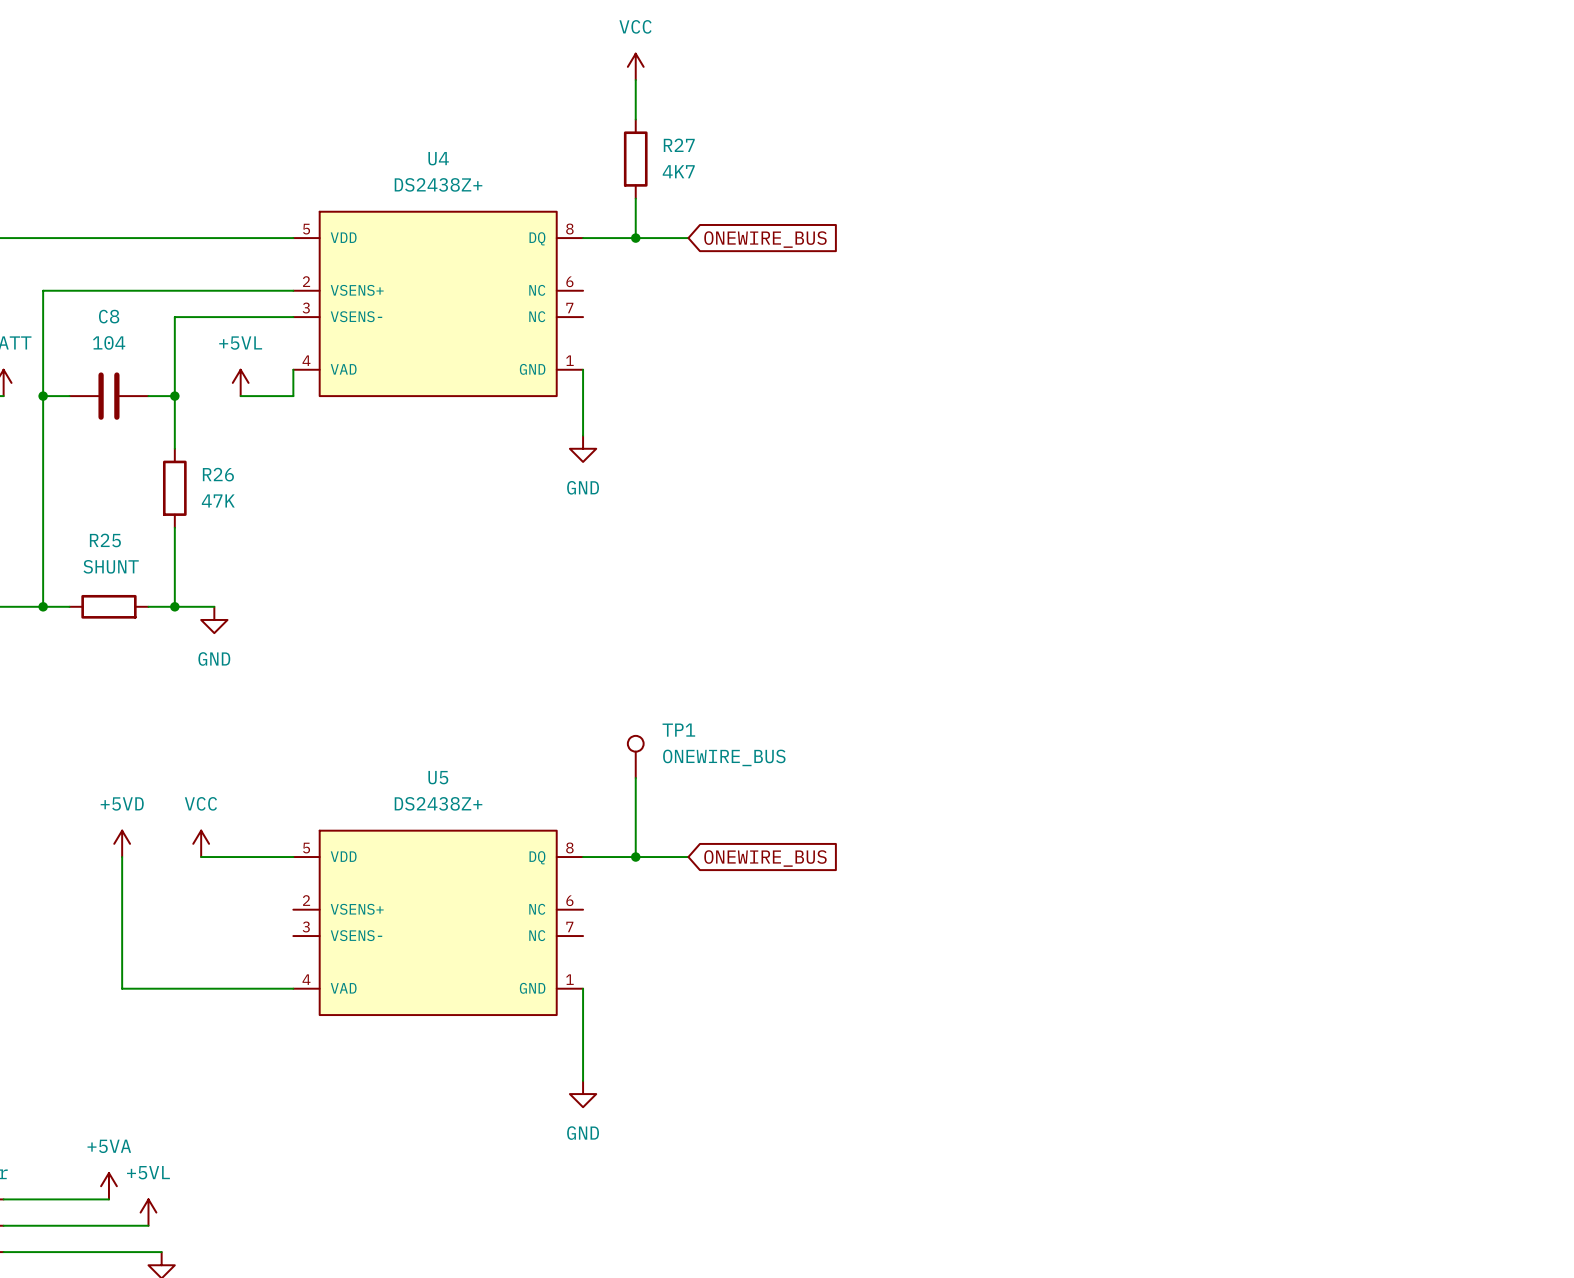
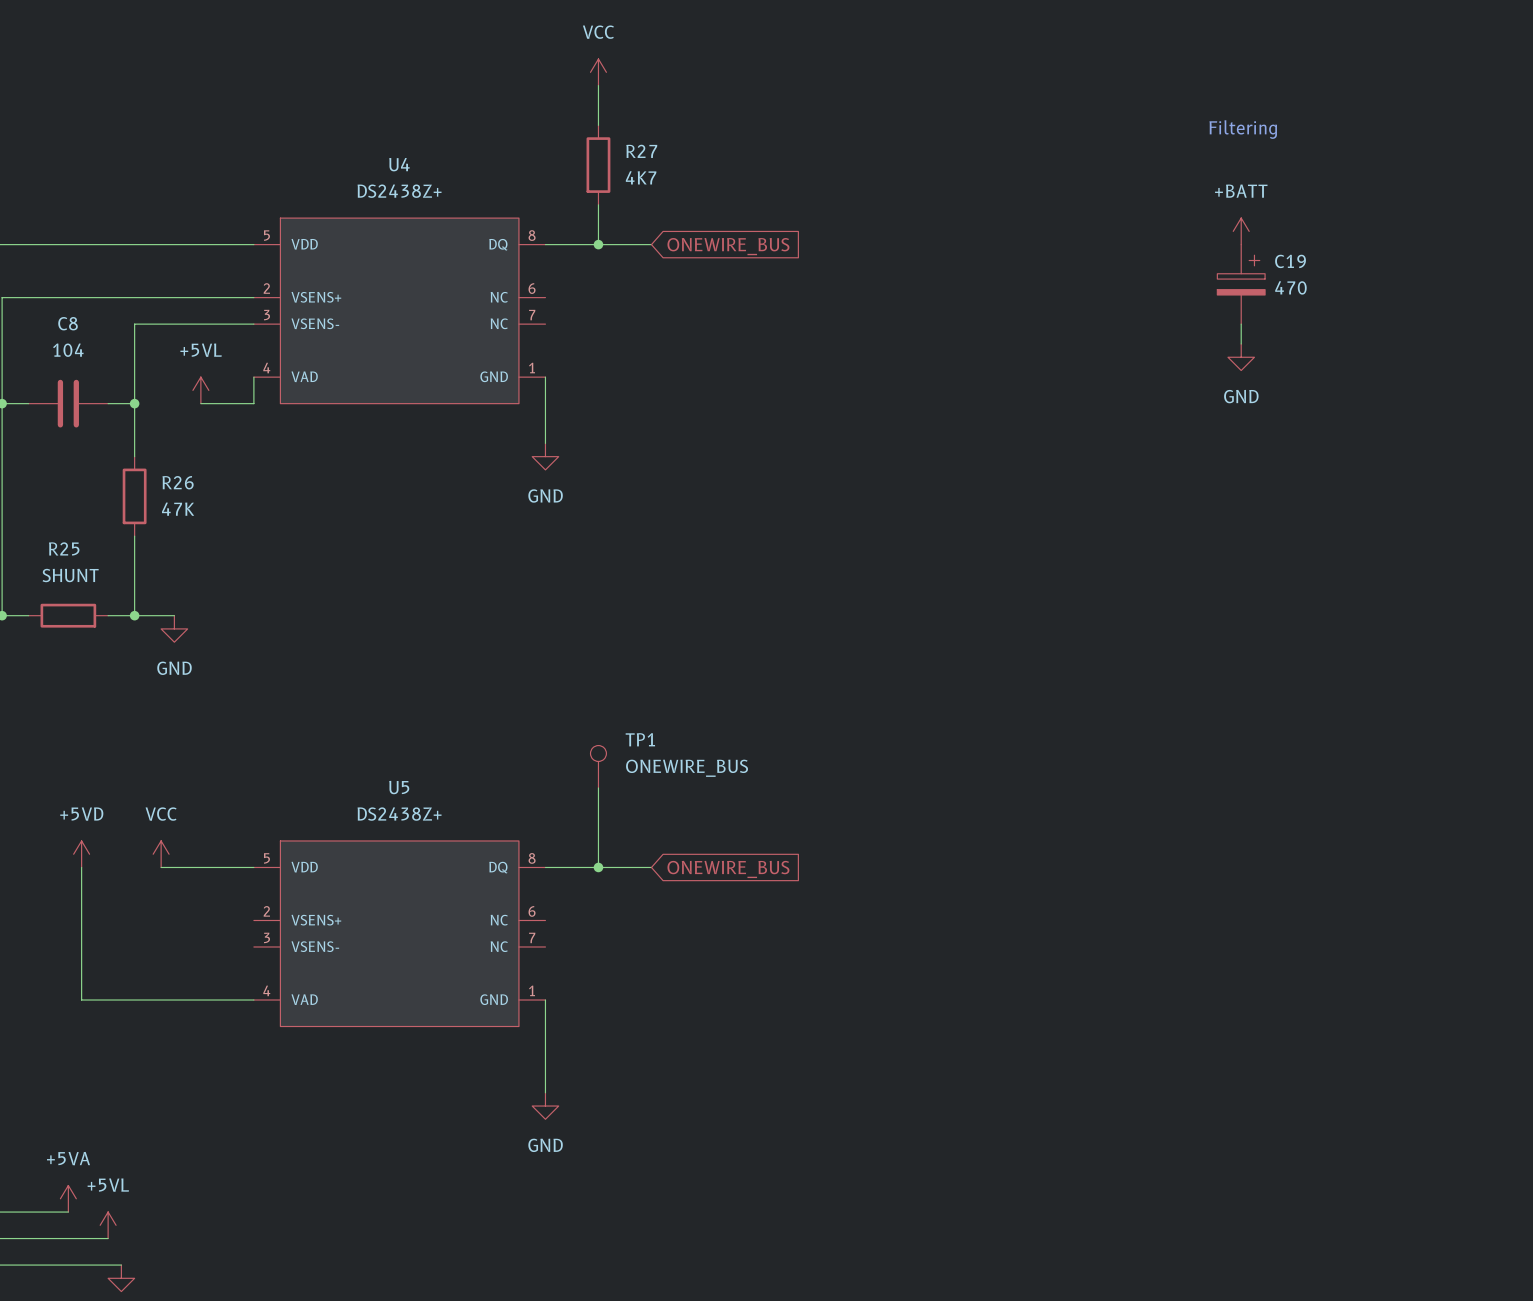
text: none -> Filtering (1243, 129)
power symbol: none -> +BATT (1241, 231)
C19: none -> 470 (1241, 284)
wire: none -> (1241, 324) (1241, 344)
power symbol: none -> GND (1241, 357)

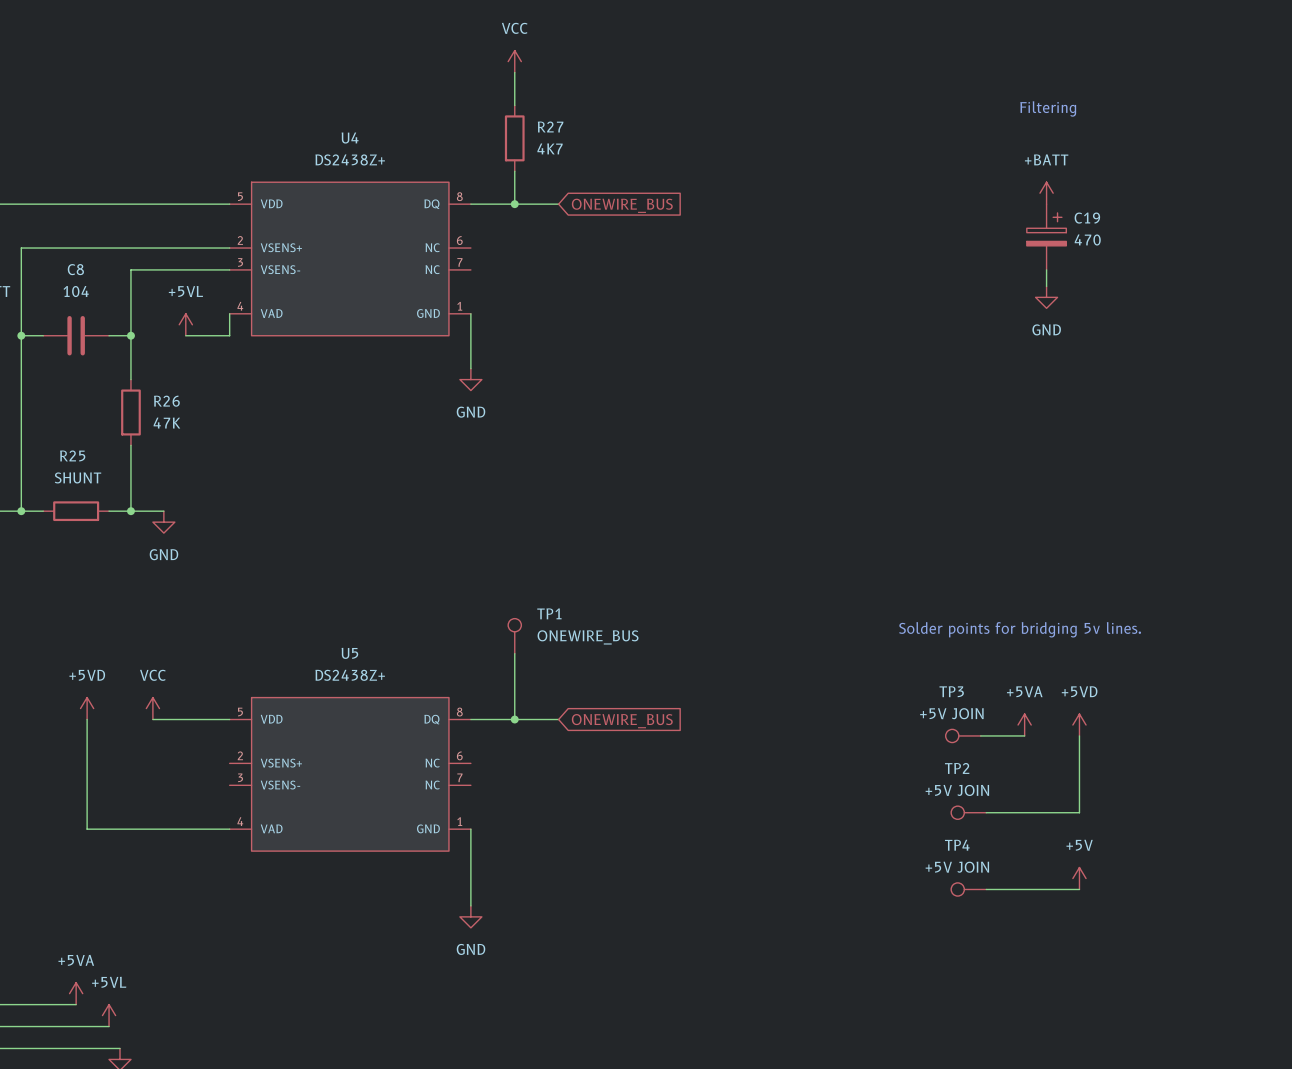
text: none -> Solder points for bridging 5v lines. (1020, 629)
power symbol: none -> +5VA (1024, 725)
power symbol: none -> +5VD (1079, 725)
TP3: none -> +5V JOIN (963, 735)
wire: none -> (980, 735) (1024, 735)
wire: none -> (1079, 735) (1079, 812) (986, 812)
TP2: none -> +5V JOIN (968, 812)
power symbol: none -> +5V (1079, 878)
TP4: none -> +5V JOIN (968, 889)
wire: none -> (986, 889) (1079, 889)

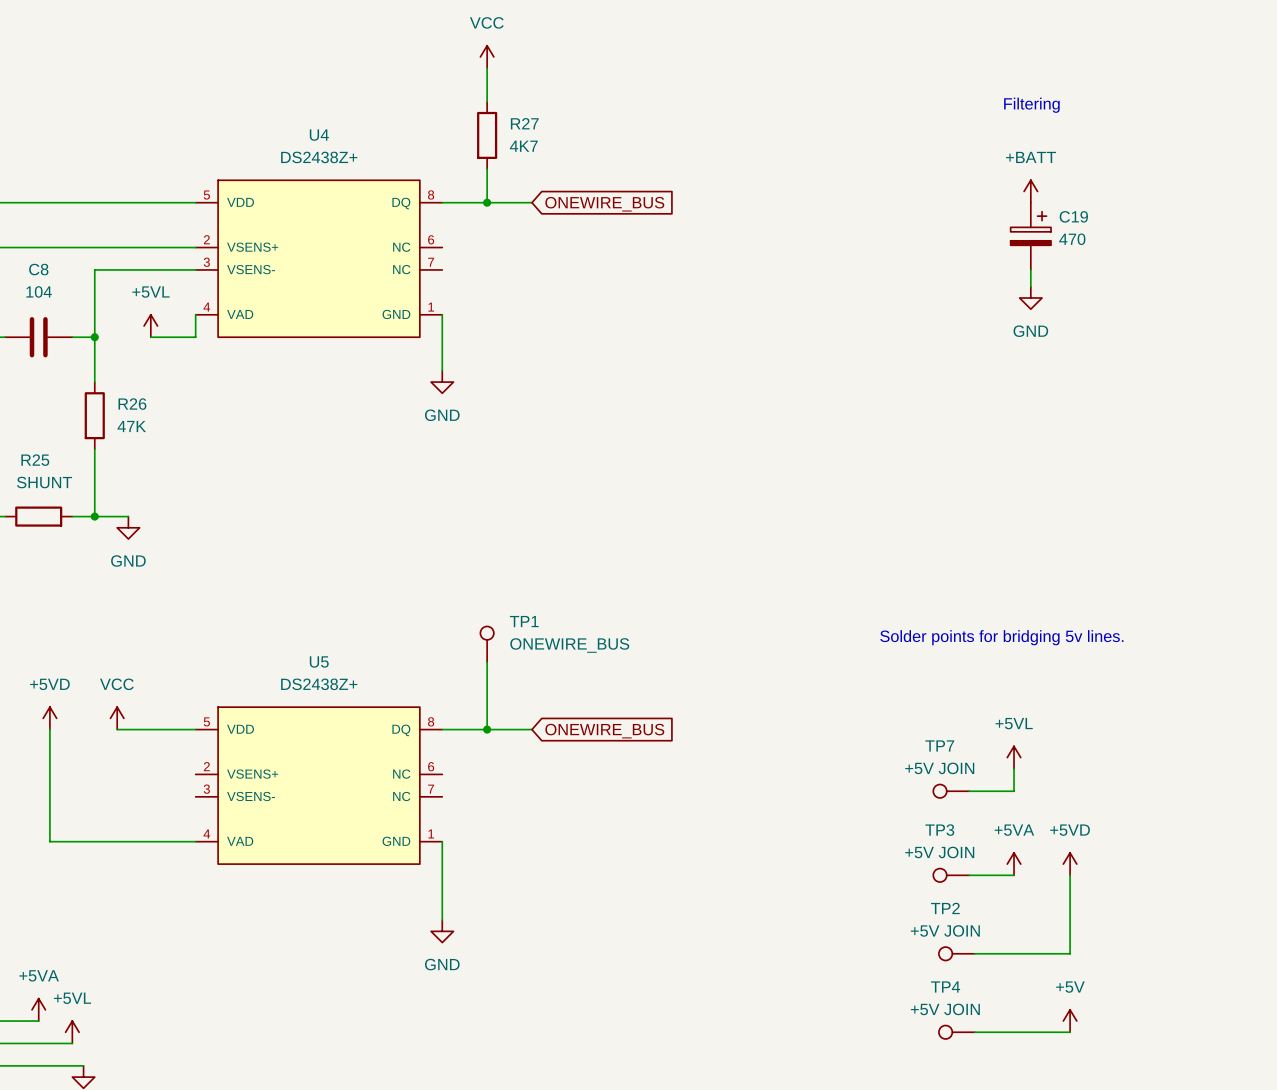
power symbol position: +5VA (1024, 725) -> +5VA (1014, 864)
power symbol position: +5VD (1079, 725) -> +5VD (1070, 864)
TP3 position: (963, 735) -> (951, 875)
wire: (980, 735) (1024, 735) -> (969, 875) (1014, 875)
wire: (1079, 735) (1079, 812) (986, 812) -> (1070, 875) (1070, 953) (974, 953)
power symbol: none -> +5VL (1014, 757)
wire: none -> (1014, 768) (1014, 791) (969, 791)
TP7: none -> +5V JOIN (951, 791)
TP2 position: (968, 812) -> (956, 953)
power symbol position: +5V (1079, 878) -> +5V (1070, 1021)
TP4 position: (968, 889) -> (956, 1032)
wire: (986, 889) (1079, 889) -> (974, 1032) (1070, 1032)

